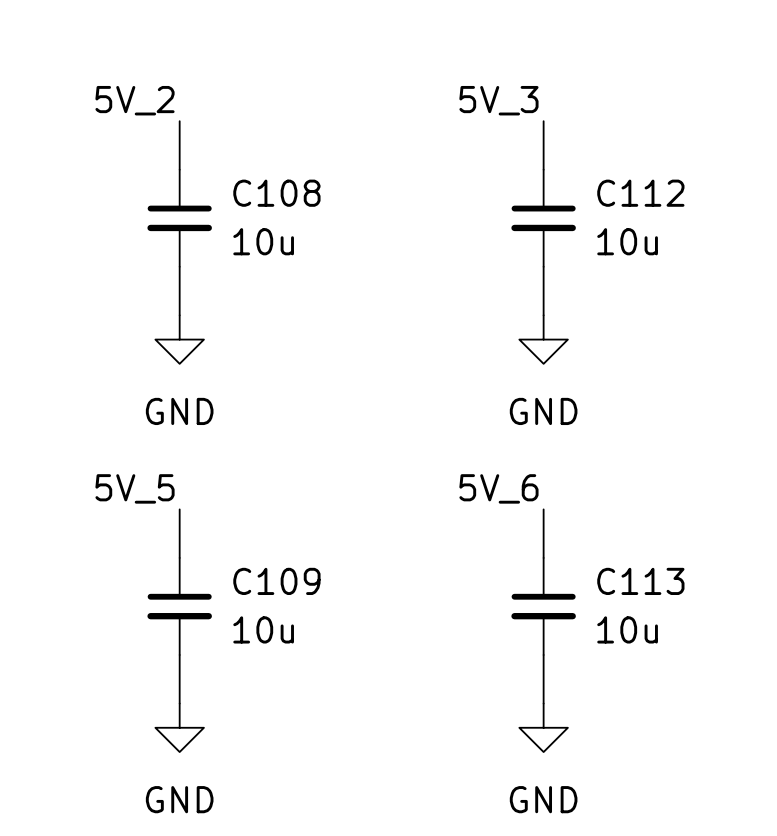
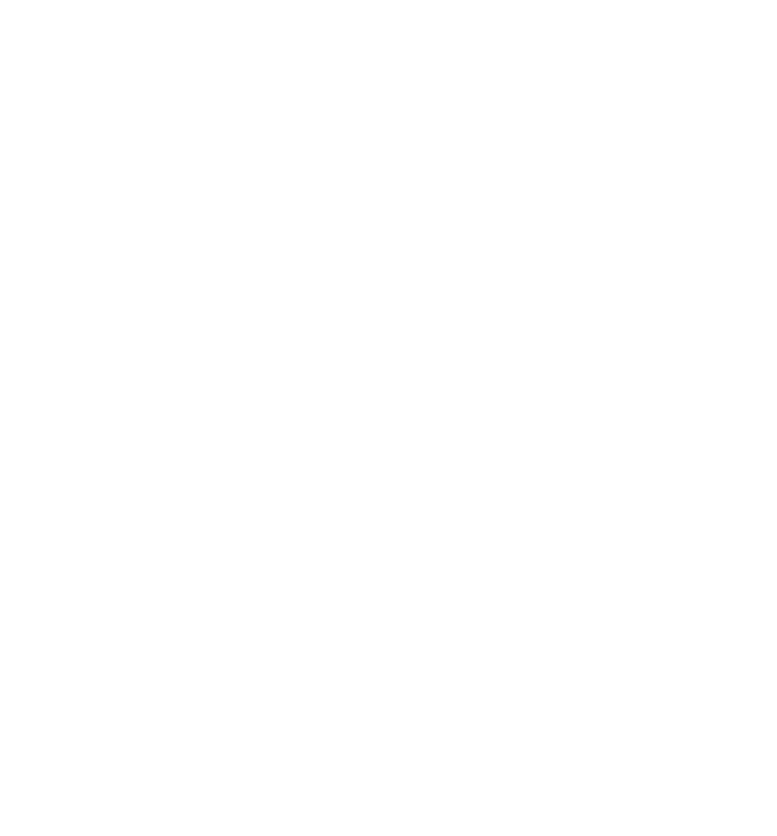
label: 5V_2 (135, 100) -> none
label: 5V_3 (498, 100) -> none
wire: (179, 121) (179, 169) -> none
wire: (543, 121) (543, 169) -> none
C108: 10u (179, 218) -> none
C112: 10u (543, 218) -> none
wire: (179, 266) (179, 315) -> none
wire: (543, 266) (543, 315) -> none
power symbol: GND (179, 339) -> none
power symbol: GND (543, 339) -> none
label: 5V_5 (135, 488) -> none
label: 5V_6 (498, 488) -> none
wire: (179, 509) (179, 557) -> none
wire: (543, 509) (543, 557) -> none
C109: 10u (179, 606) -> none
C113: 10u (543, 606) -> none
wire: (179, 654) (179, 703) -> none
wire: (543, 654) (543, 703) -> none
power symbol: GND (179, 727) -> none
power symbol: GND (543, 727) -> none

